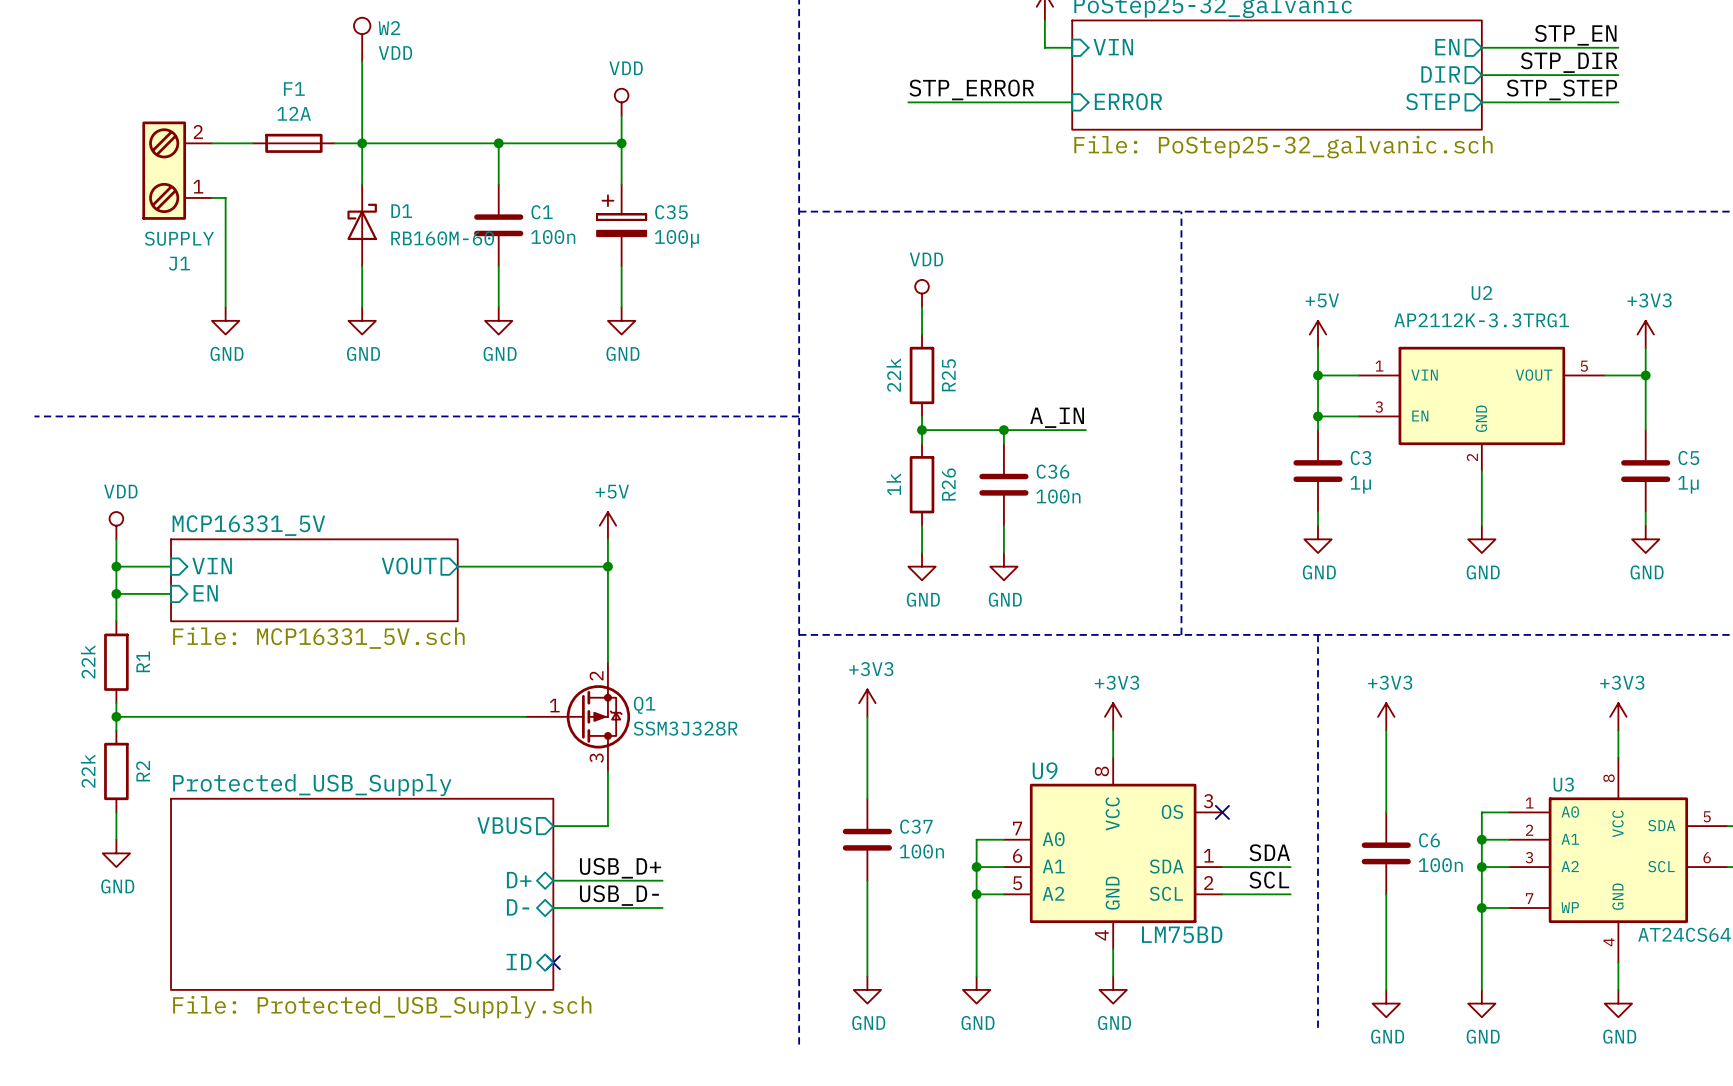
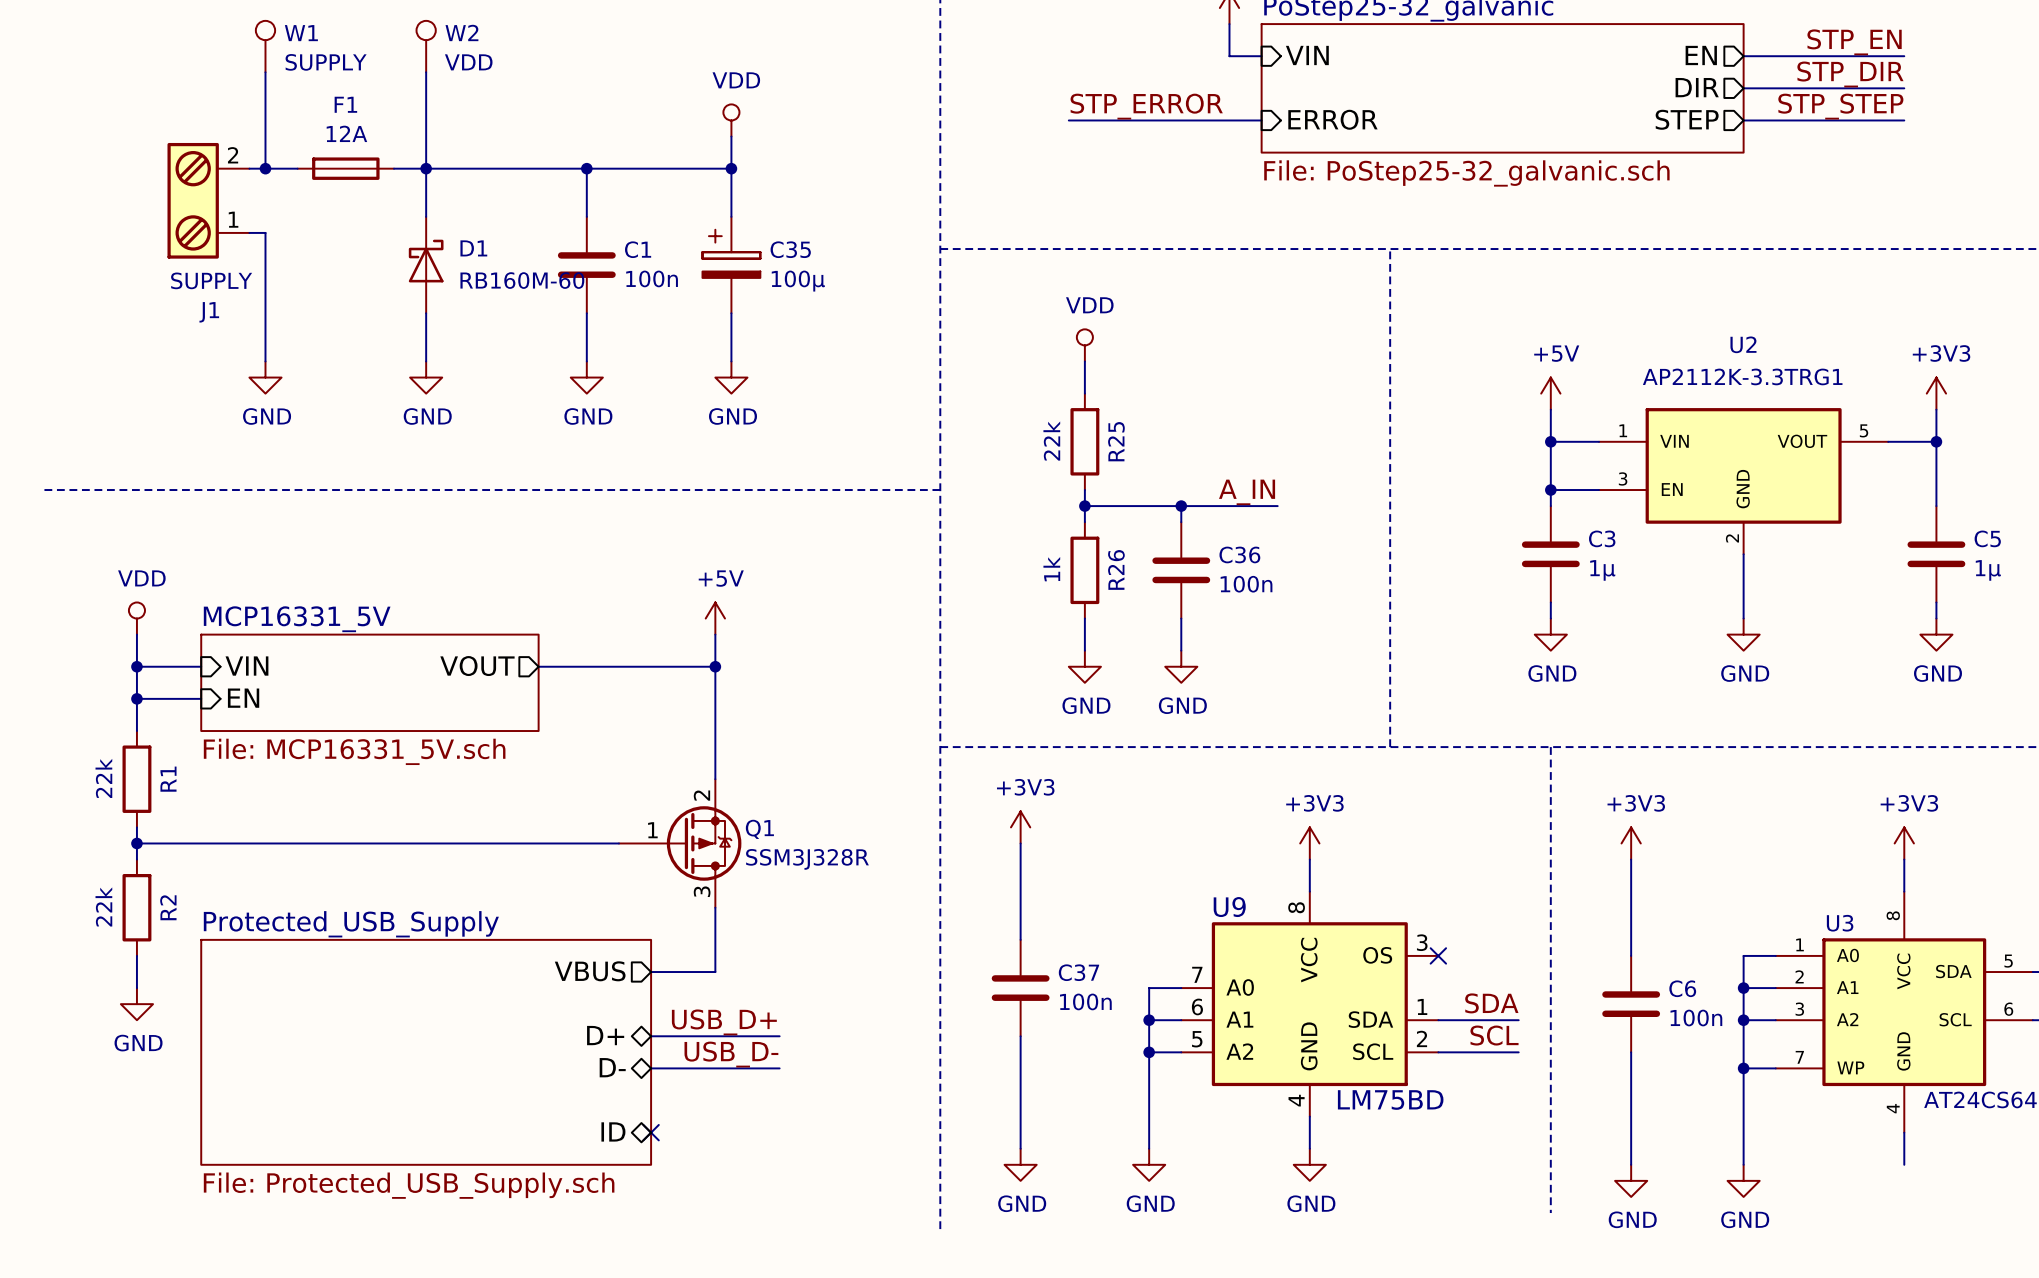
W1: none -> SUPPLY (265, 46)
wire: none -> (265, 72) (265, 168)
junction: none -> (265, 168)
power symbol: GND (1618, 1003) -> none

